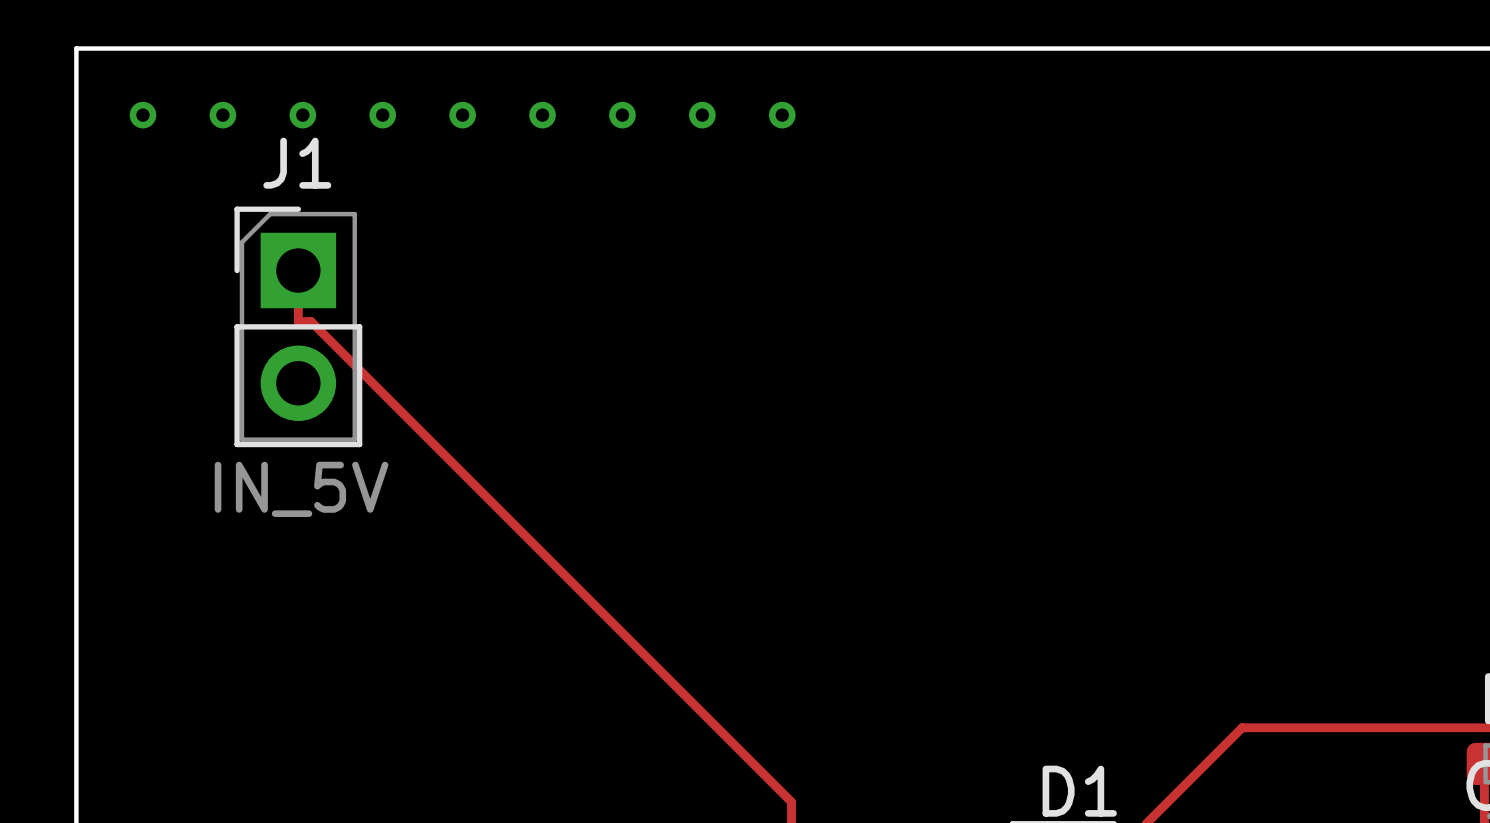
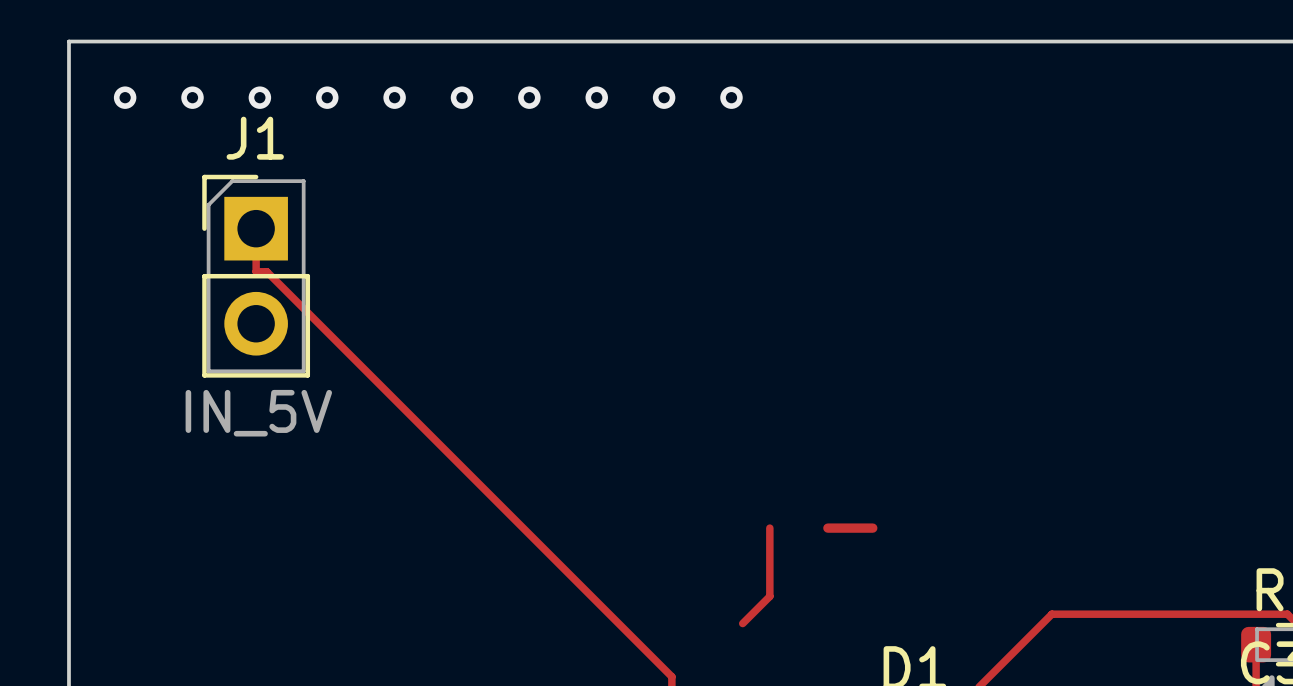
via: none -> (731, 97)
top track: none -> (769, 528) (769, 596) (742, 623)
top track: none -> (827, 528) (872, 528)

